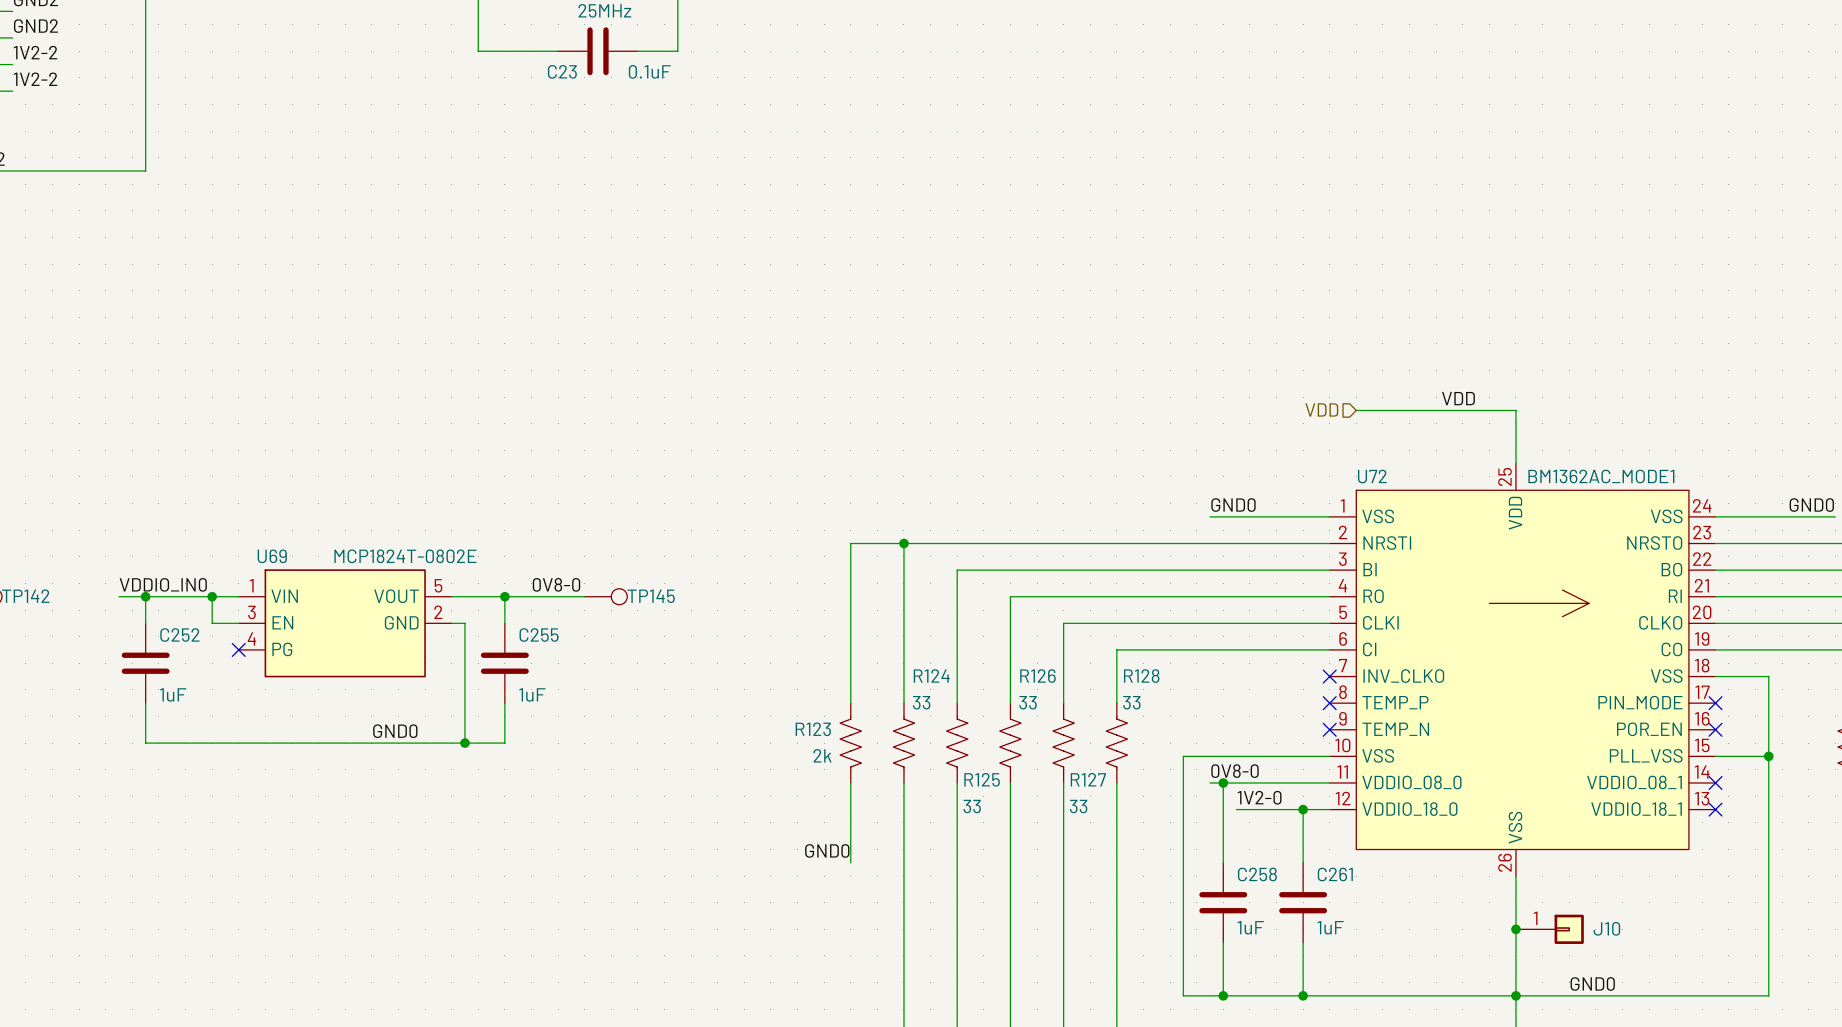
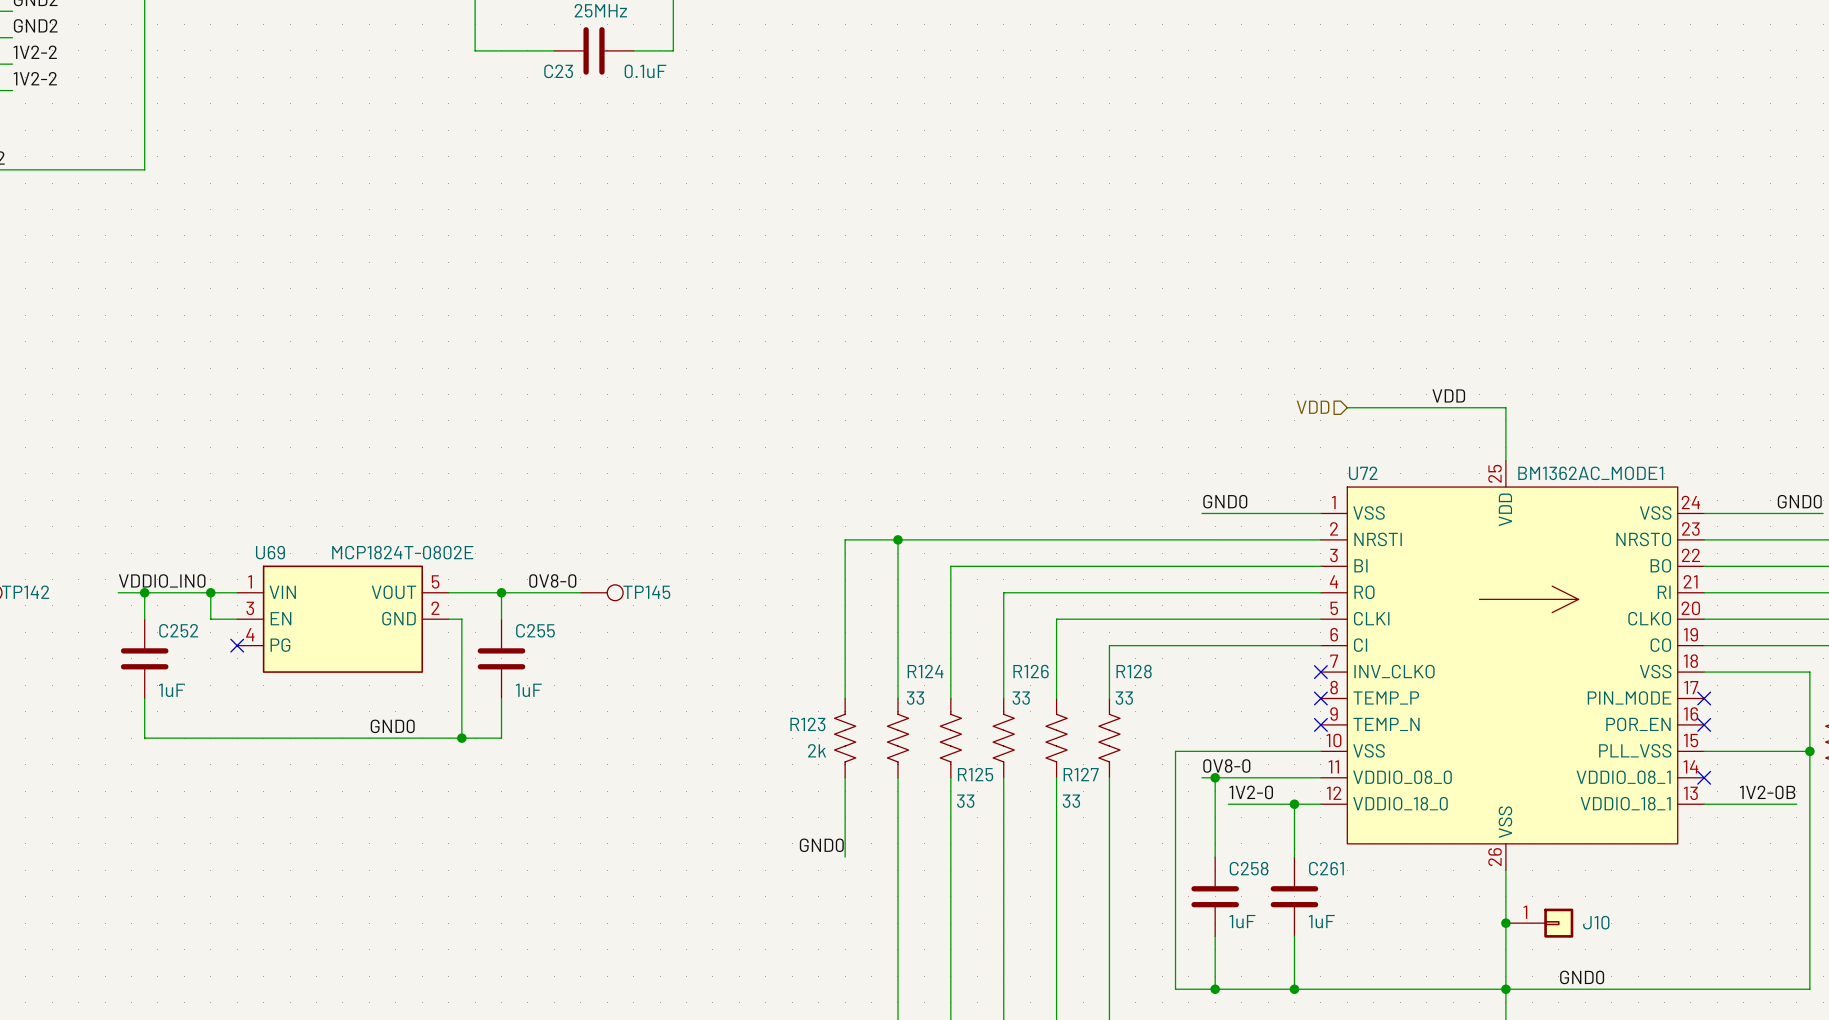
wire: (1768, 676) (1768, 995) -> (1757, 672) (1809, 672) (1809, 989) (1757, 989)
wire: none -> (1757, 751) (1809, 751)
junction position: (1768, 756) -> (1809, 751)
label: none -> 1V2-0B (1767, 792)
wire: none -> (1704, 804) (1796, 804)
no-connect mark: (1715, 809) -> none

